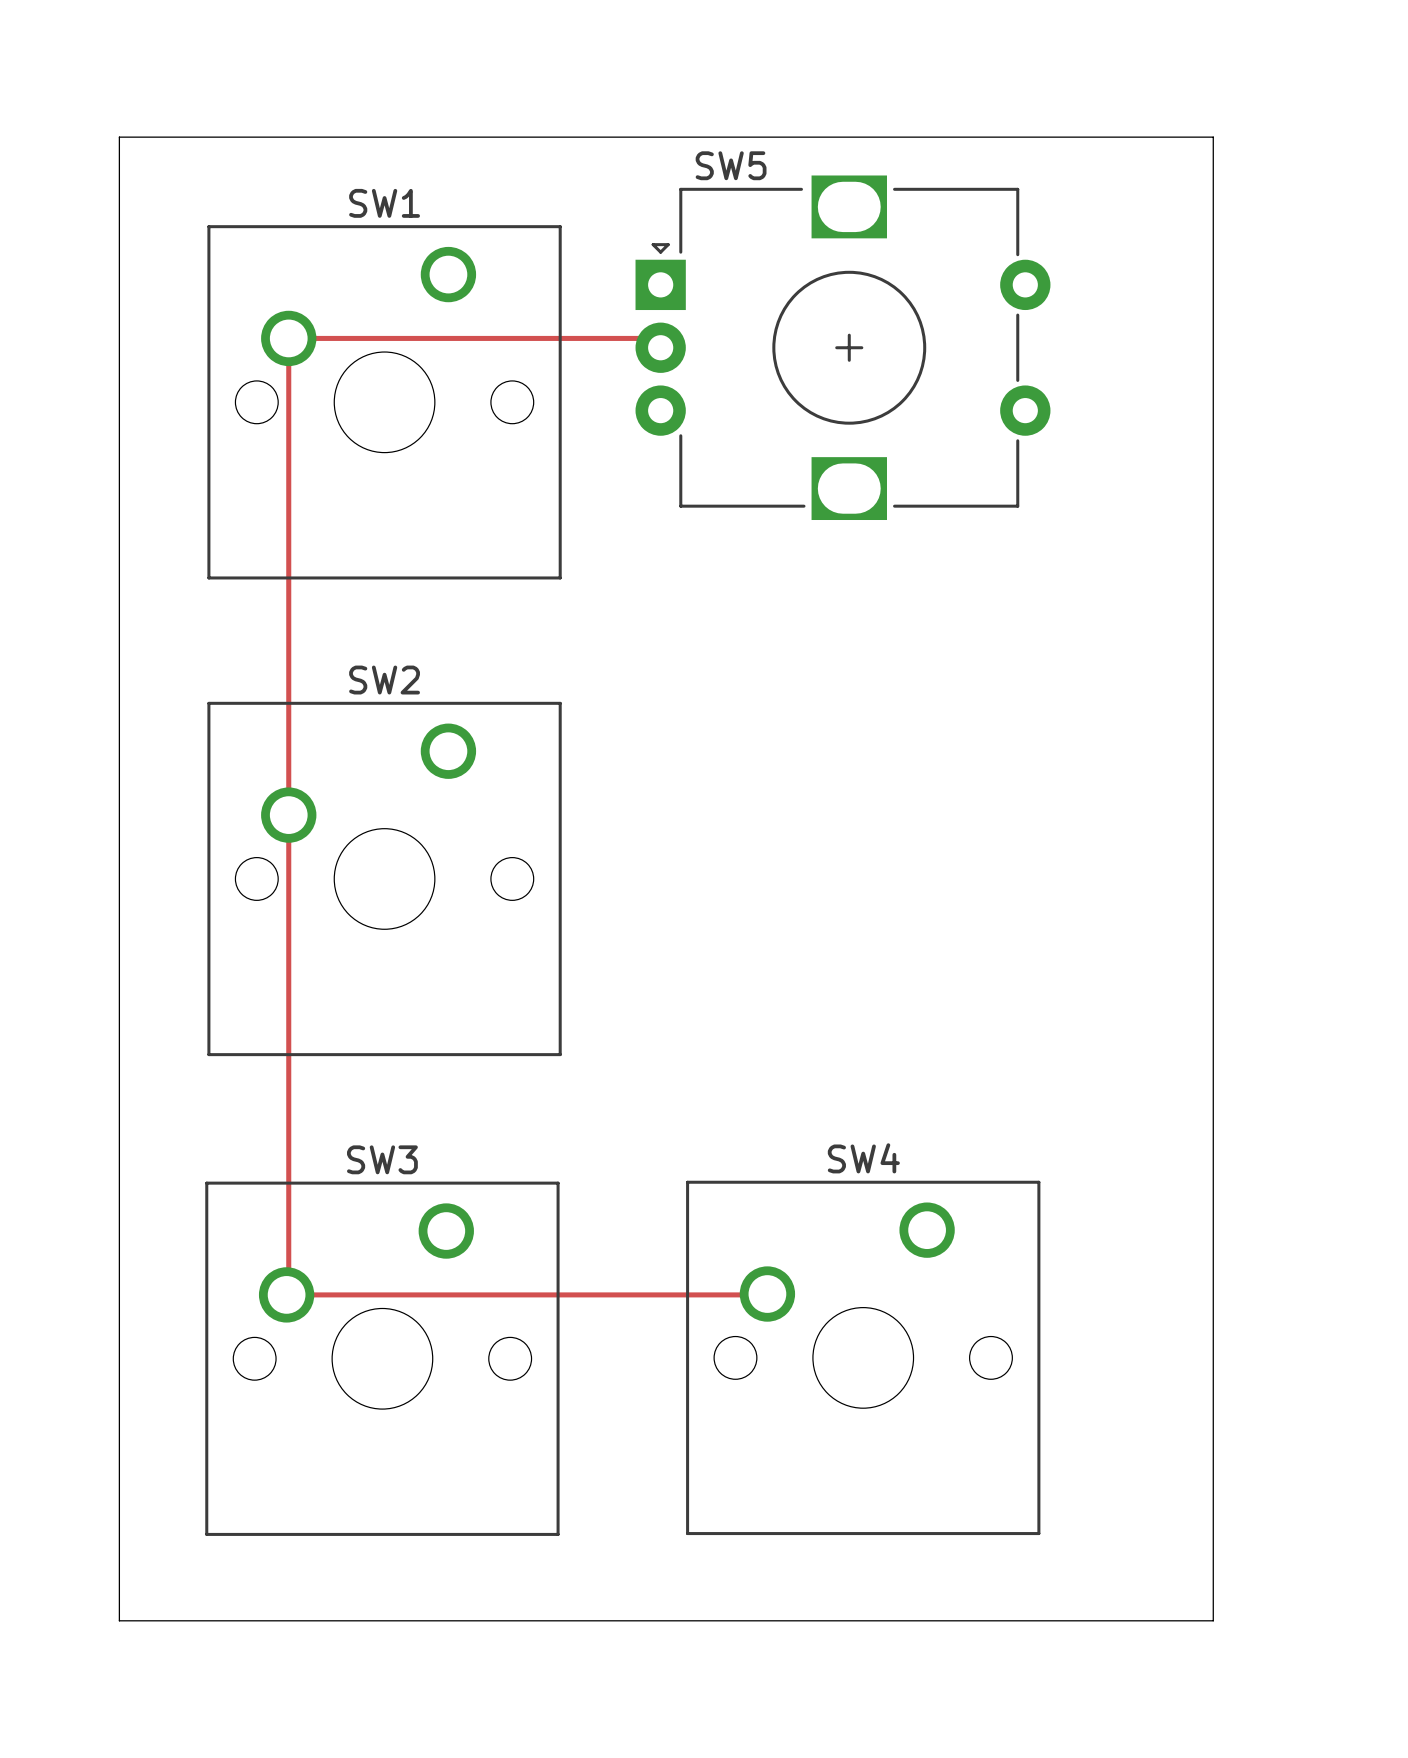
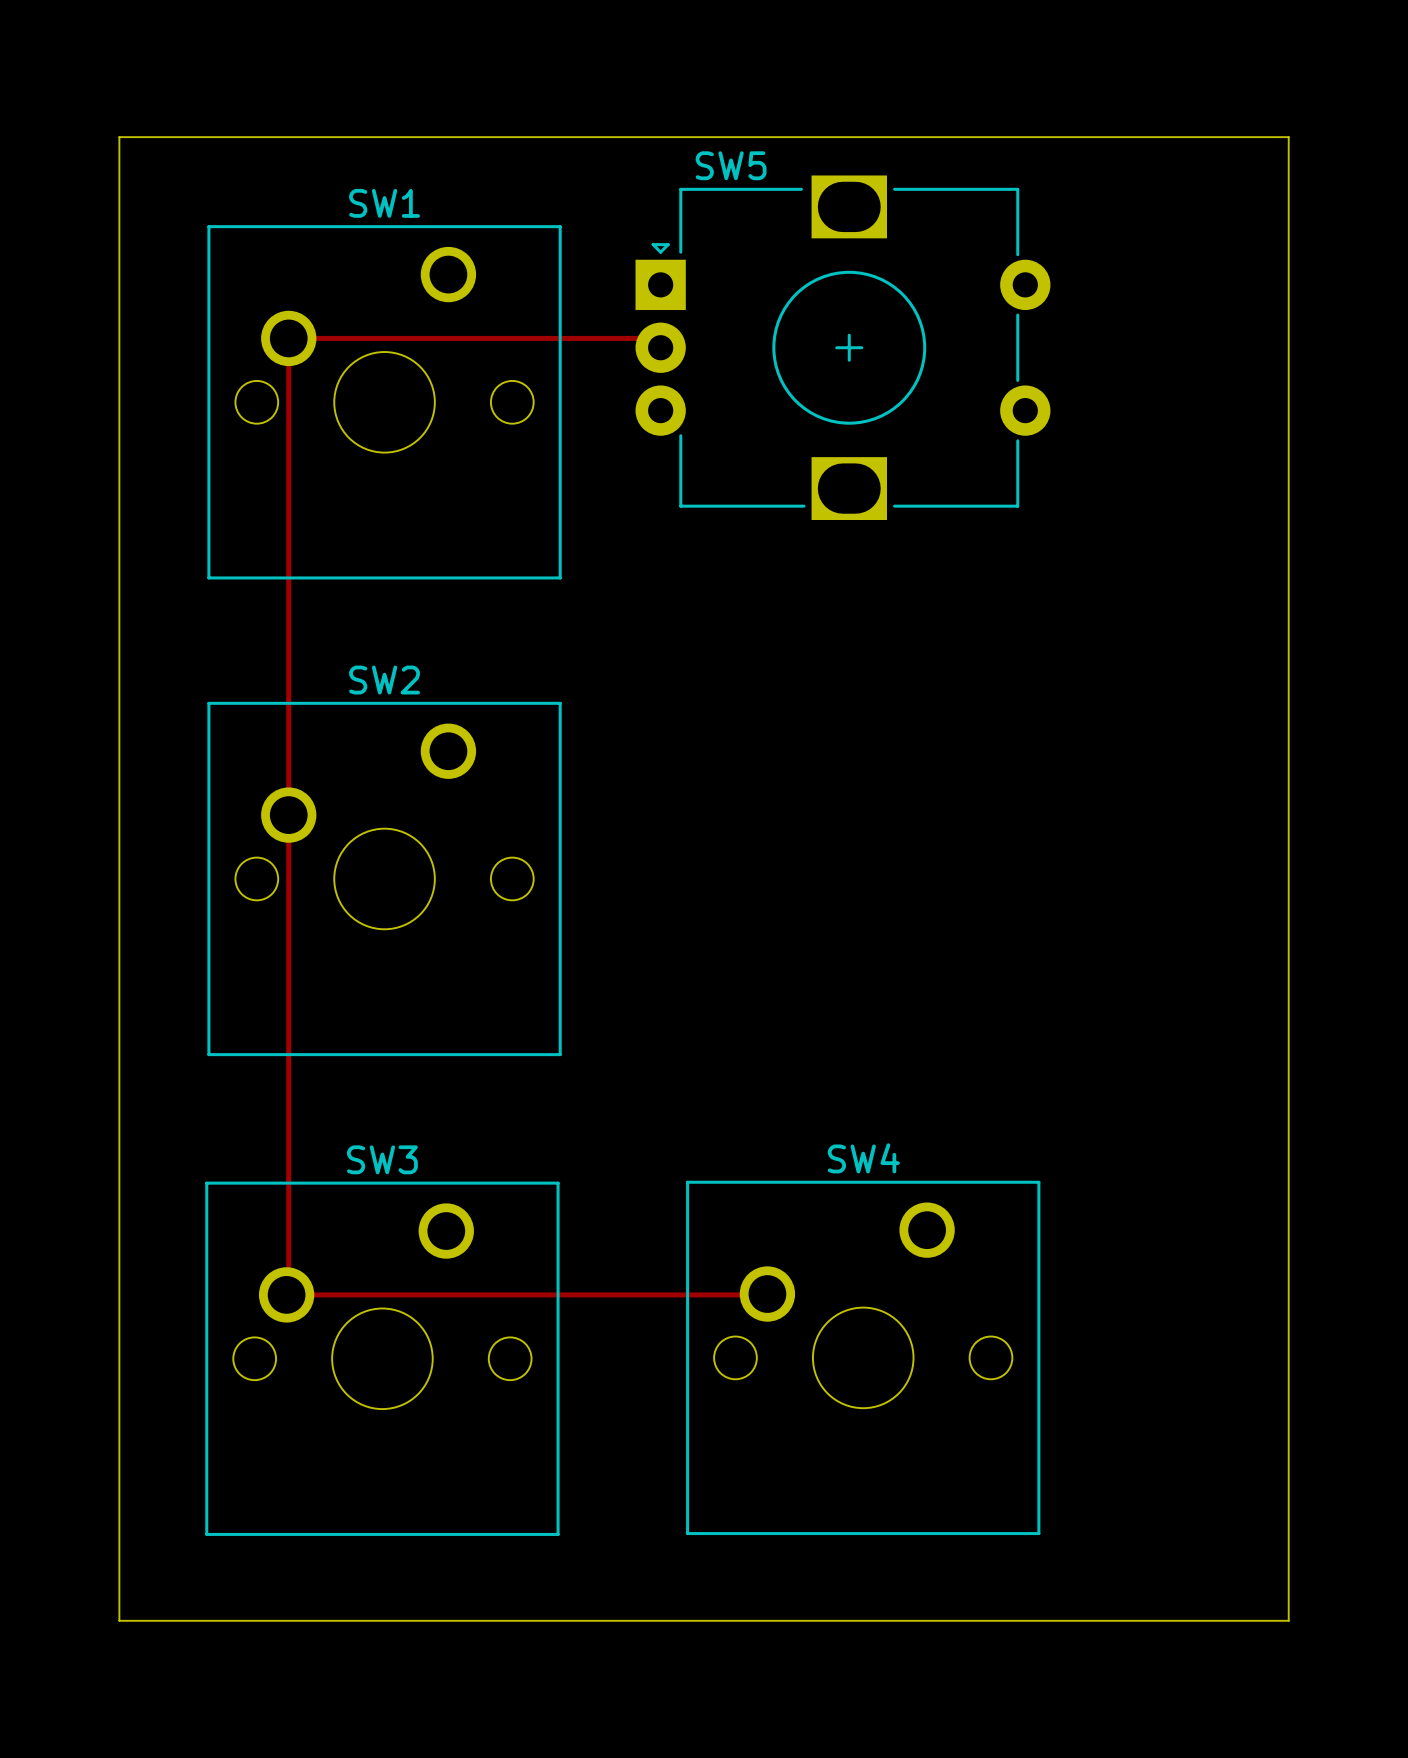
board edge: (1213, 137) (1213, 1620) -> (1213, 137) (1288, 137) (1288, 1620) (1213, 1620)

